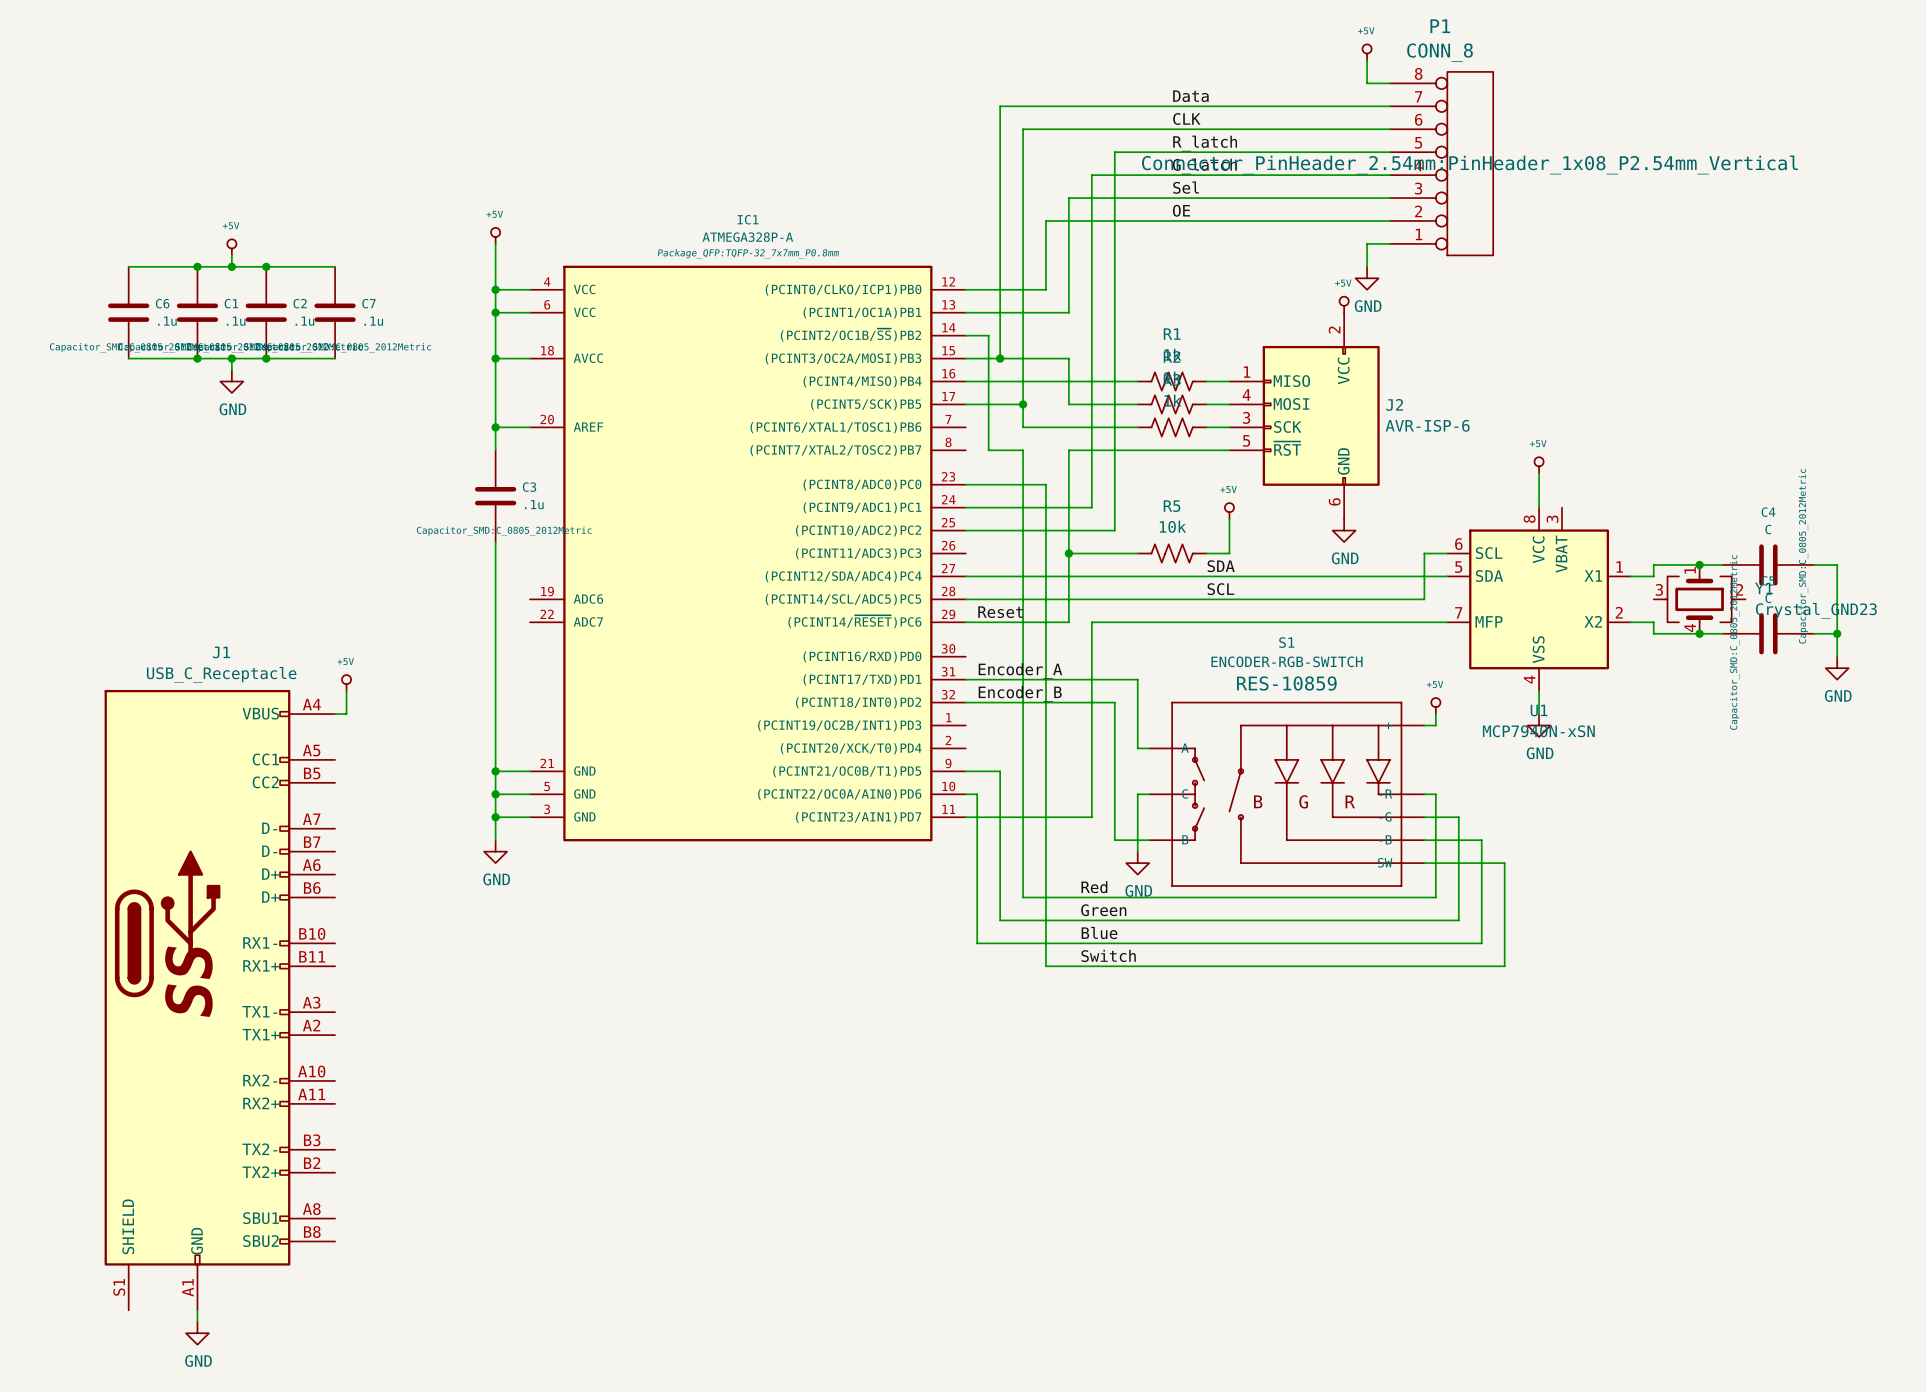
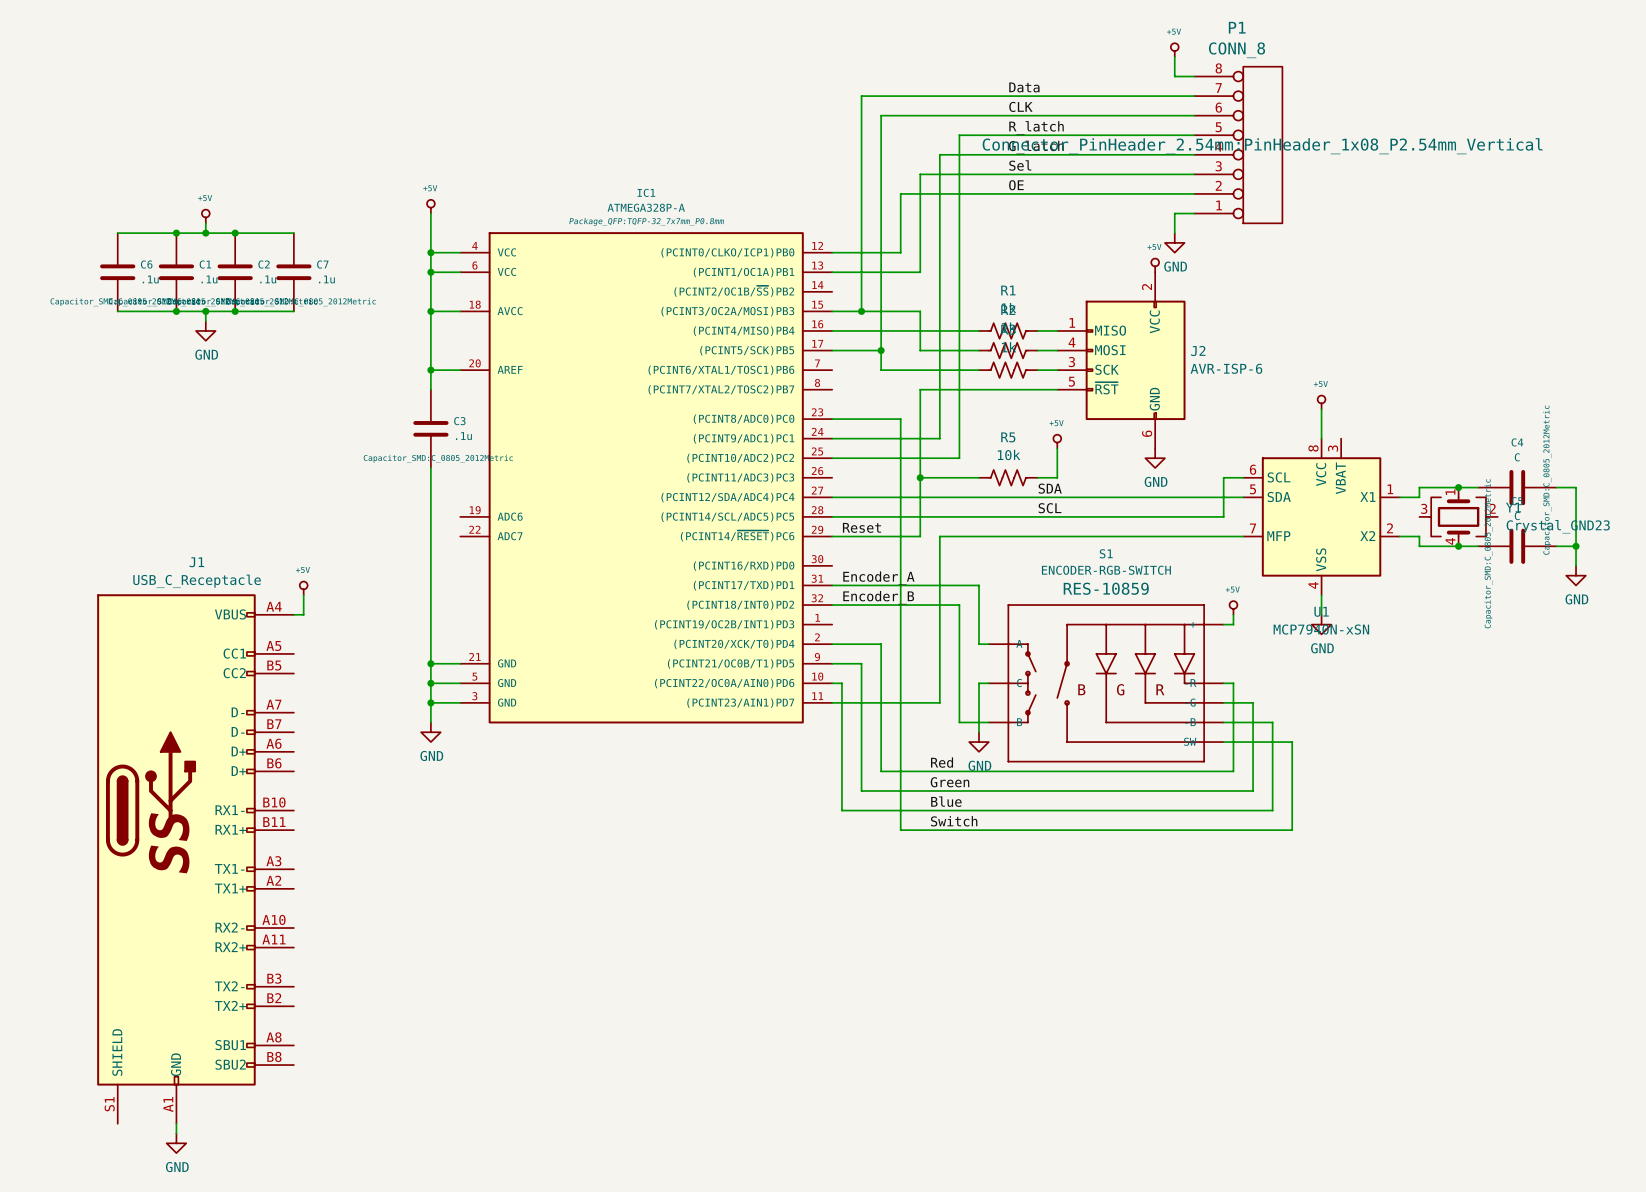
wire: (965, 335) (988, 335) (988, 450) (1023, 450) (1023, 748) -> (832, 644) (881, 644)

